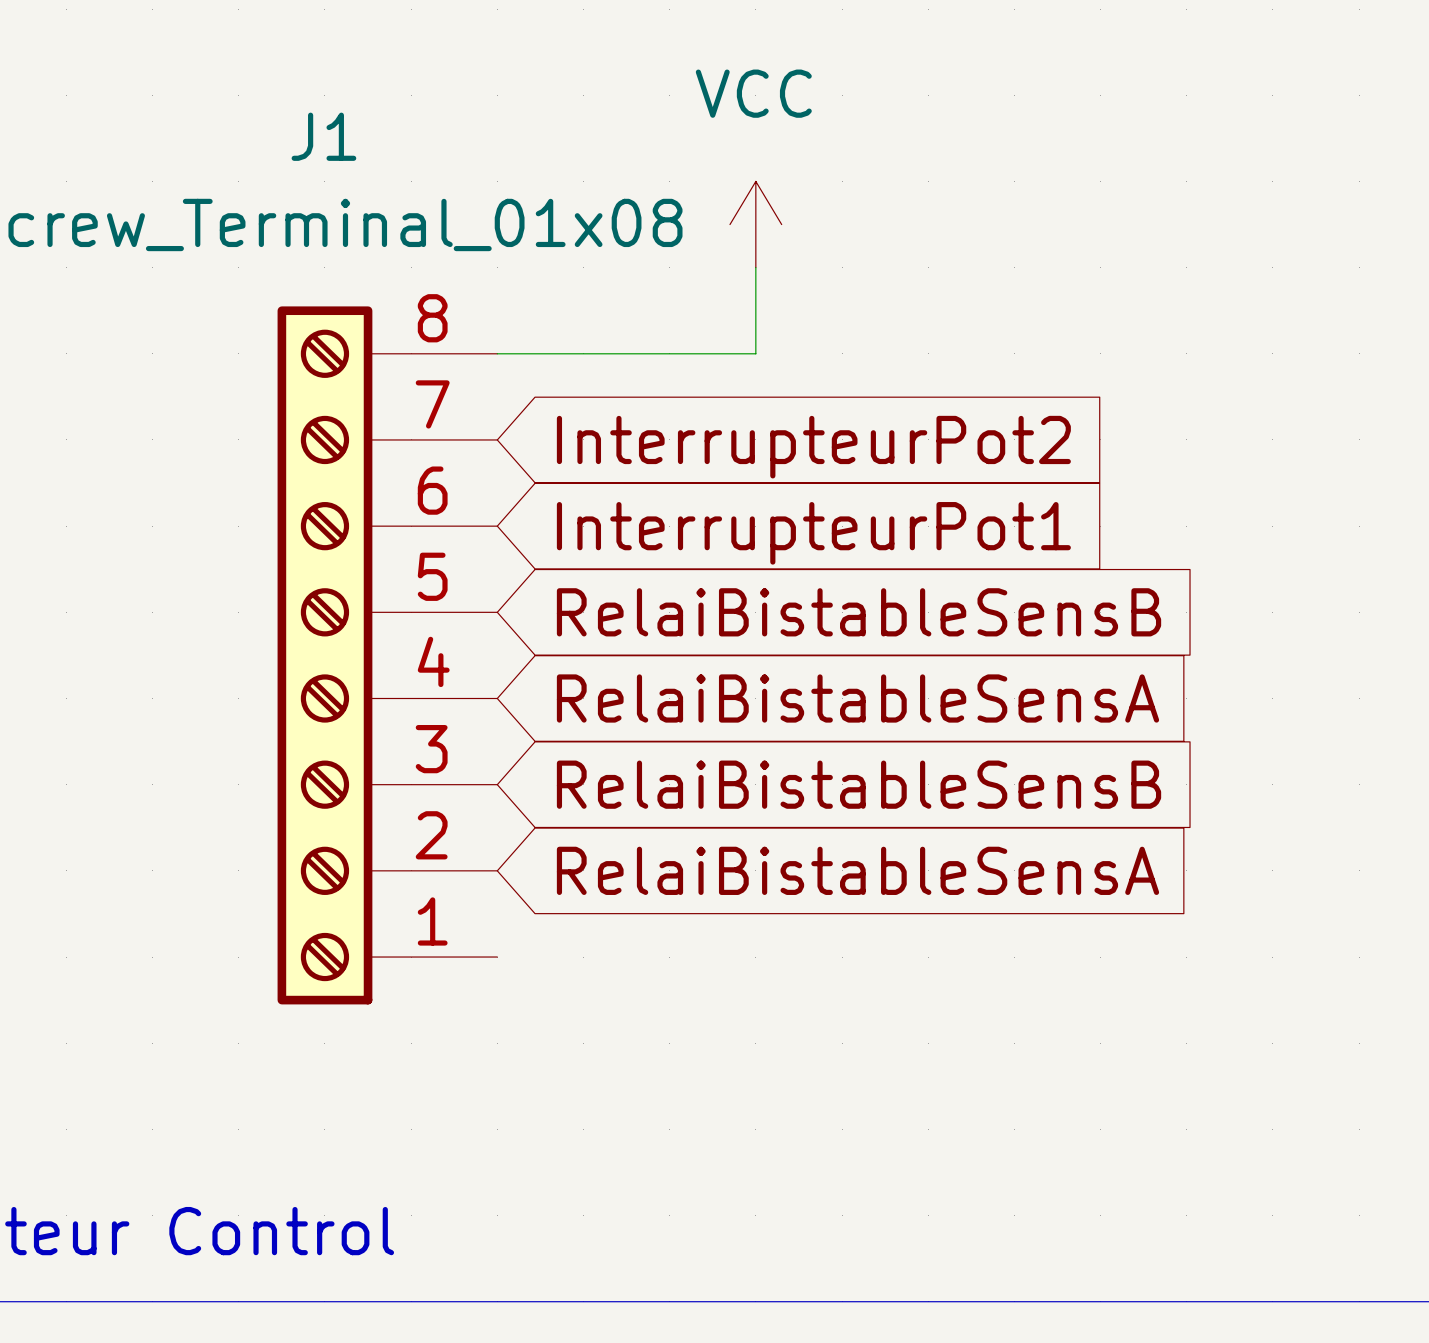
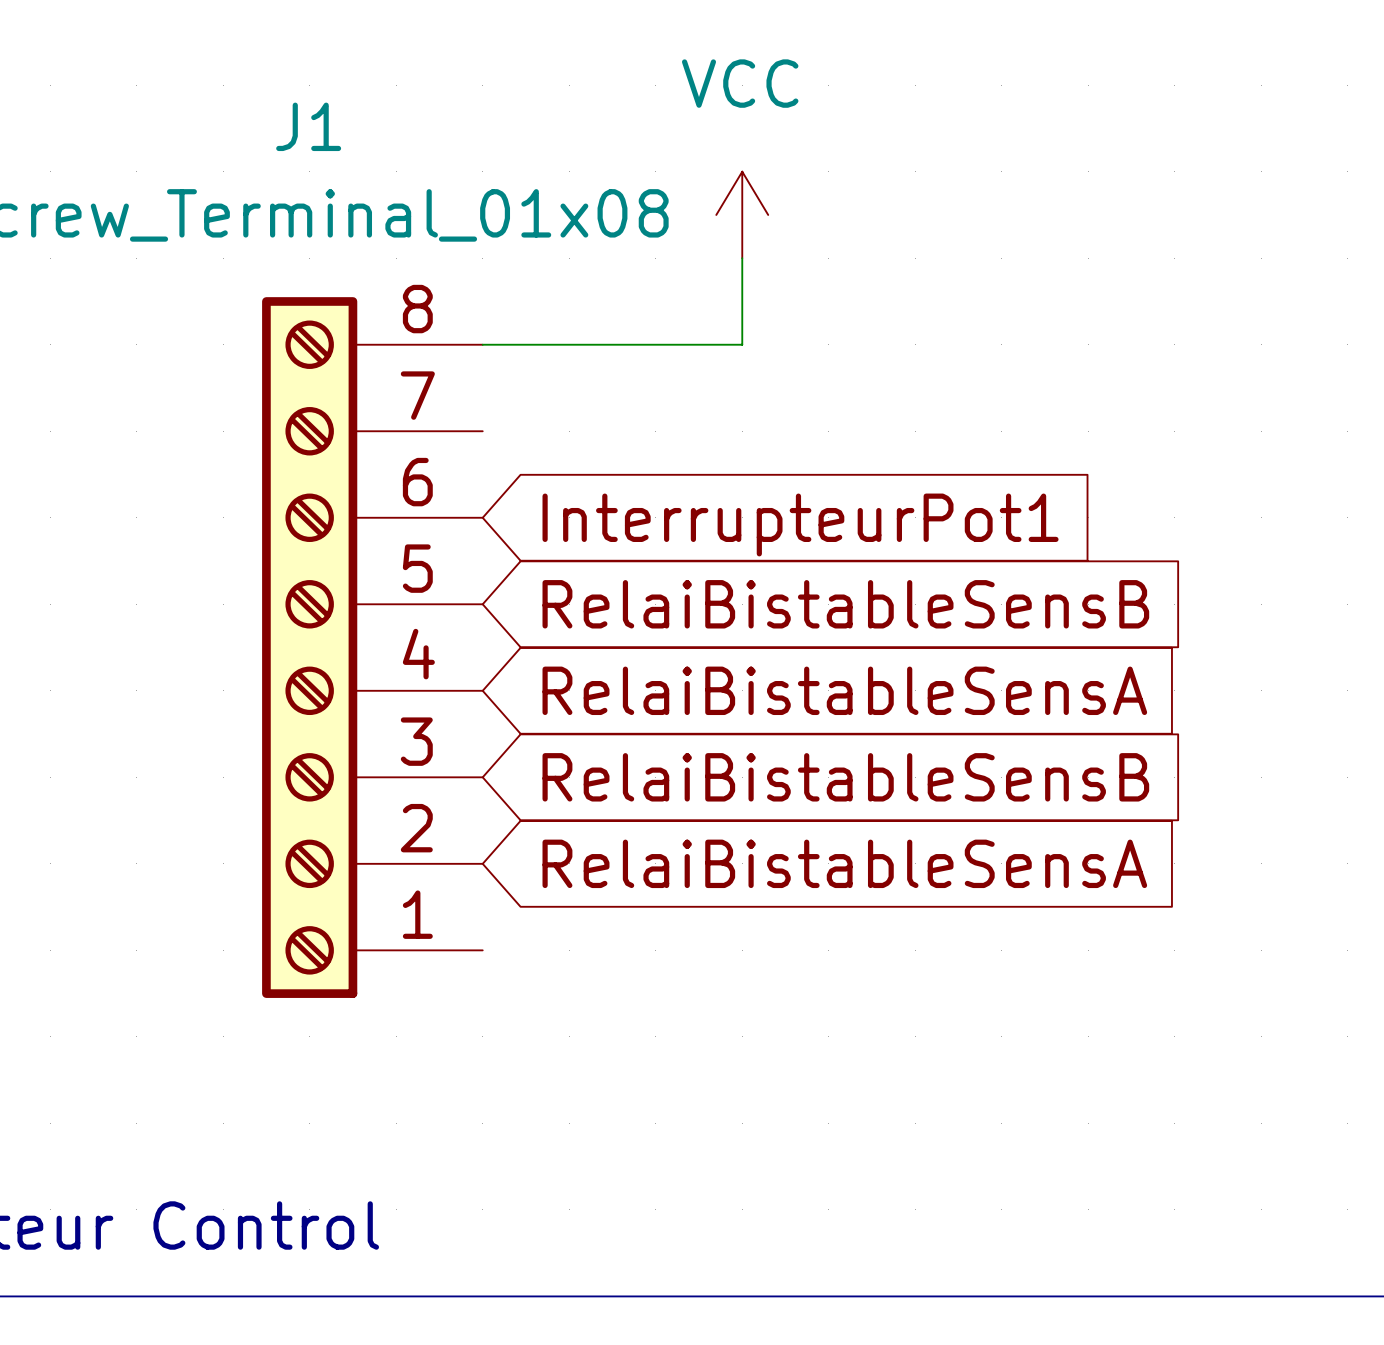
global label: InterrupteurPot2 (813, 447) -> none

